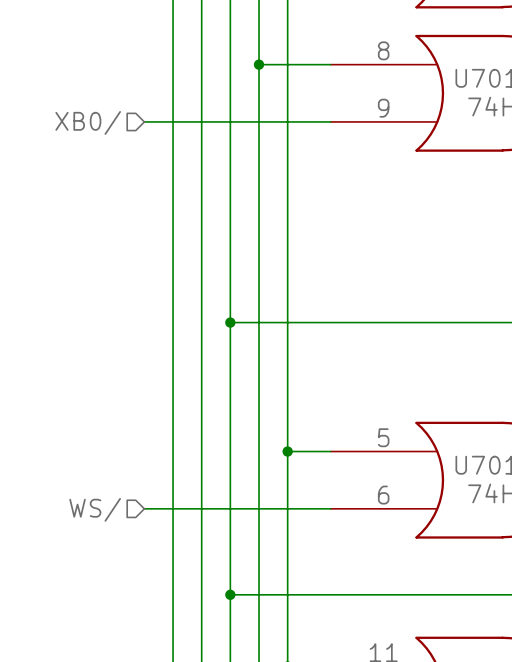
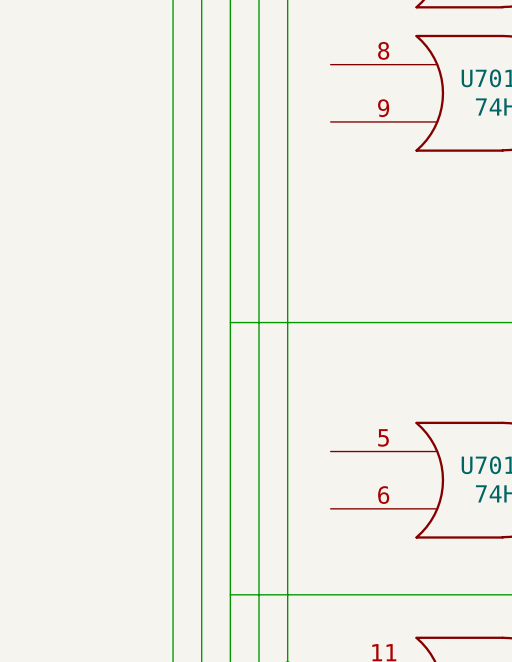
wire: (259, 64) (330, 64) -> none
junction: (259, 64) -> none
wire: (144, 121) (330, 121) -> none
hierarchical label: XB0/ (88, 122) -> none
junction: (230, 322) -> none
wire: (287, 451) (330, 451) -> none
junction: (287, 451) -> none
wire: (144, 508) (330, 508) -> none
hierarchical label: WS/ (95, 509) -> none
junction: (230, 594) -> none

